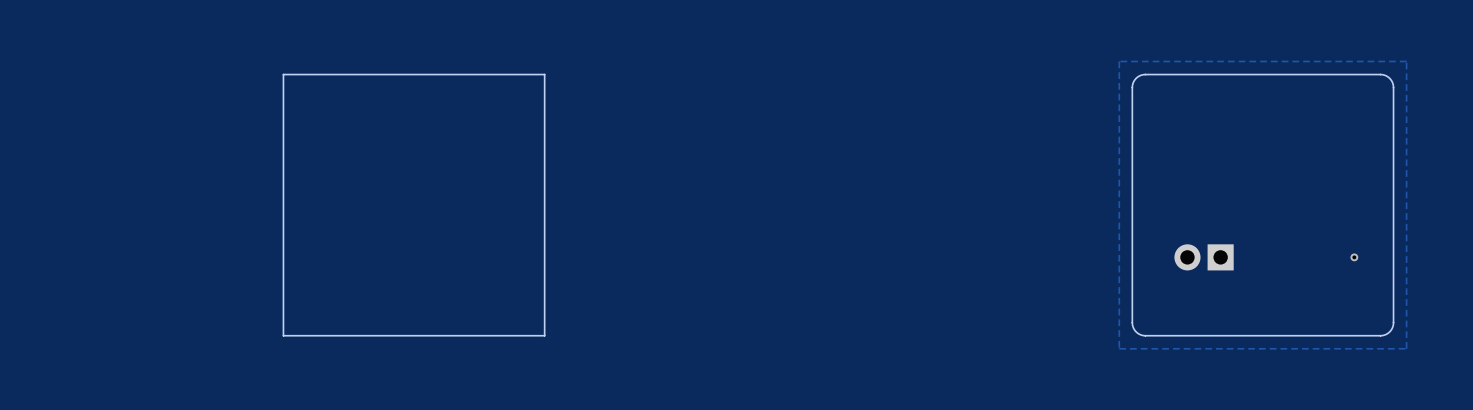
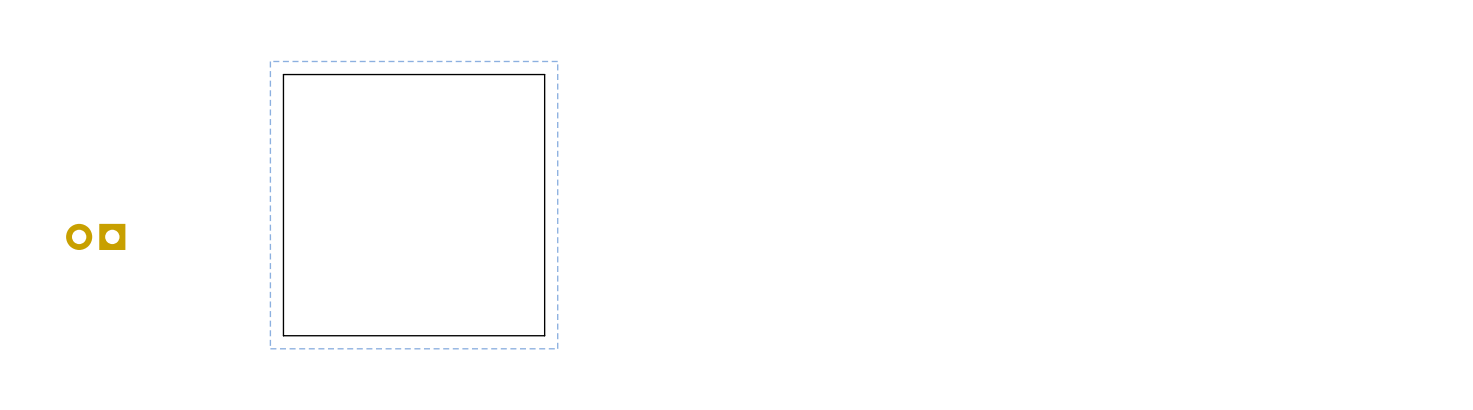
zone outline: none -> (557, 61) (270, 61) (270, 348) (557, 348) (557, 61)
zone outline: (1406, 61) (1119, 61) (1119, 348) (1406, 348) (1406, 61) -> none
board edge: (1380, 74) (1145, 74) (1136, 78) (1132, 87) (1132, 322) (1136, 331) (1145, 335) (1380, 335) (1389, 331) (1393, 322) (1393, 87) (1389, 78) (1380, 74) -> none
part: none -> (95, 236)
part: (1204, 257) -> none
via: (1354, 257) -> none

